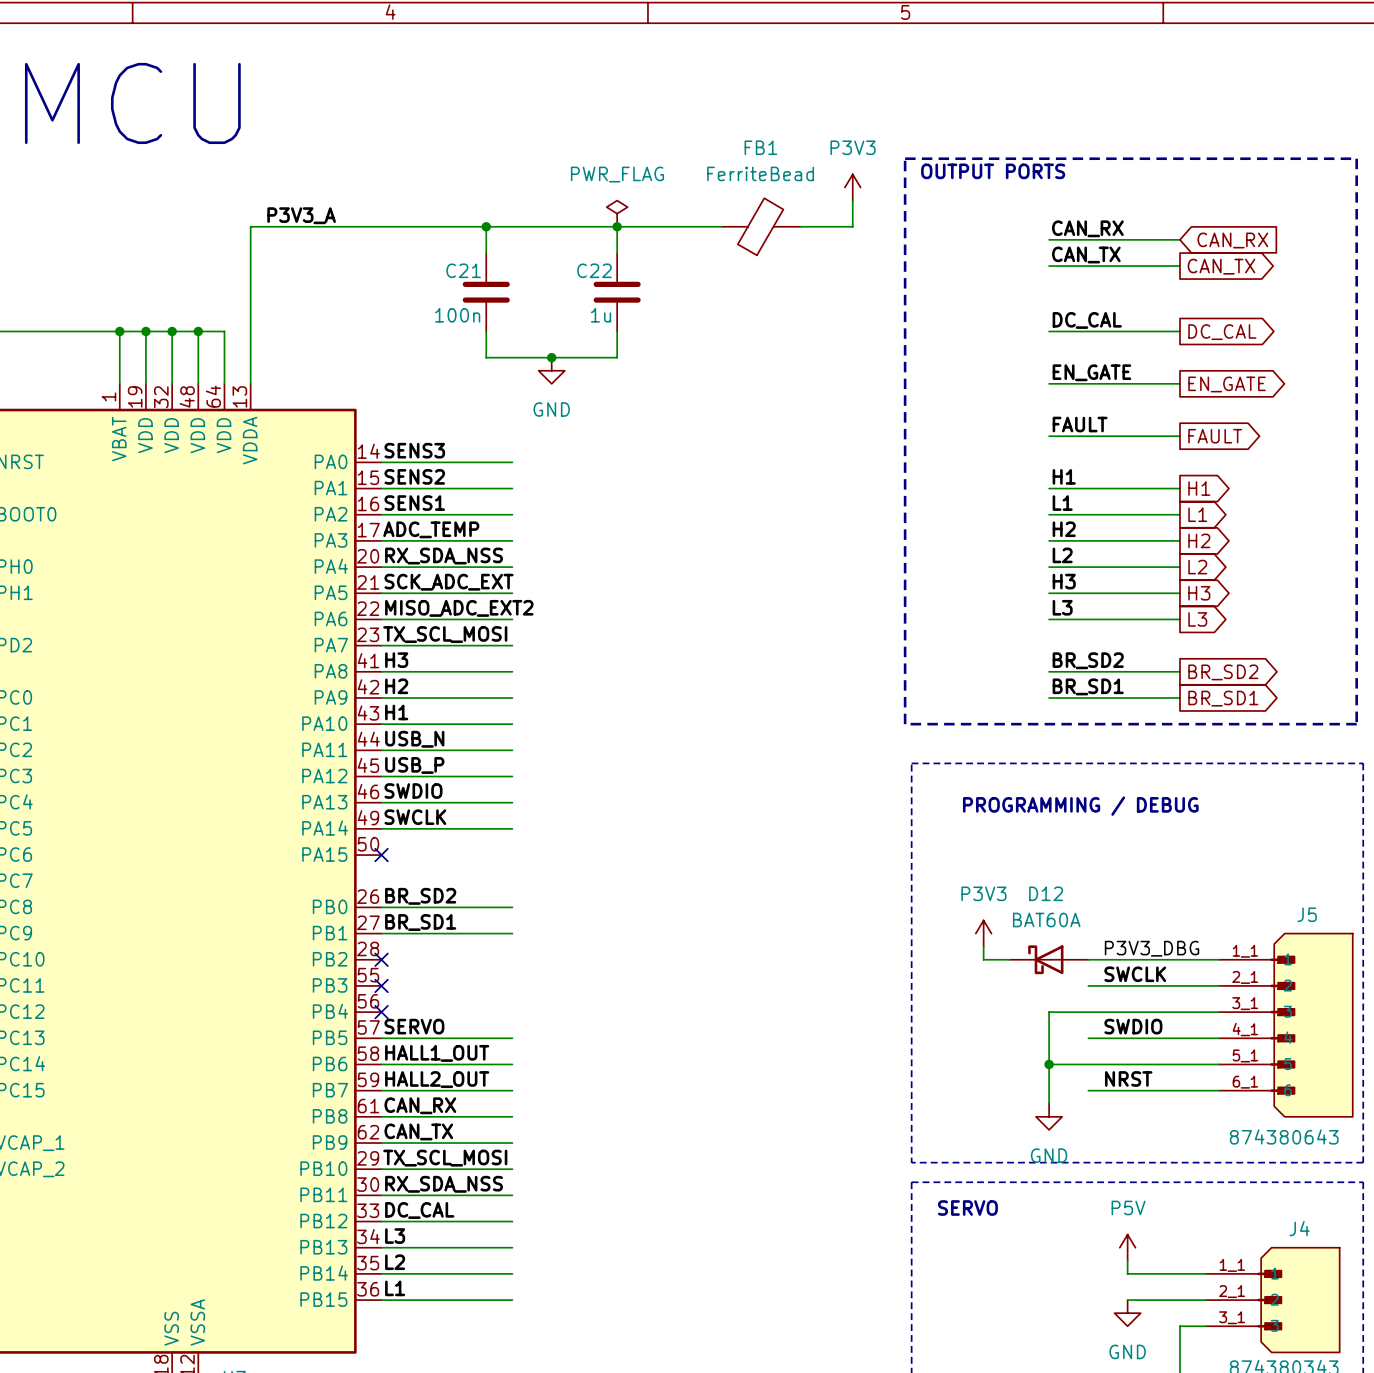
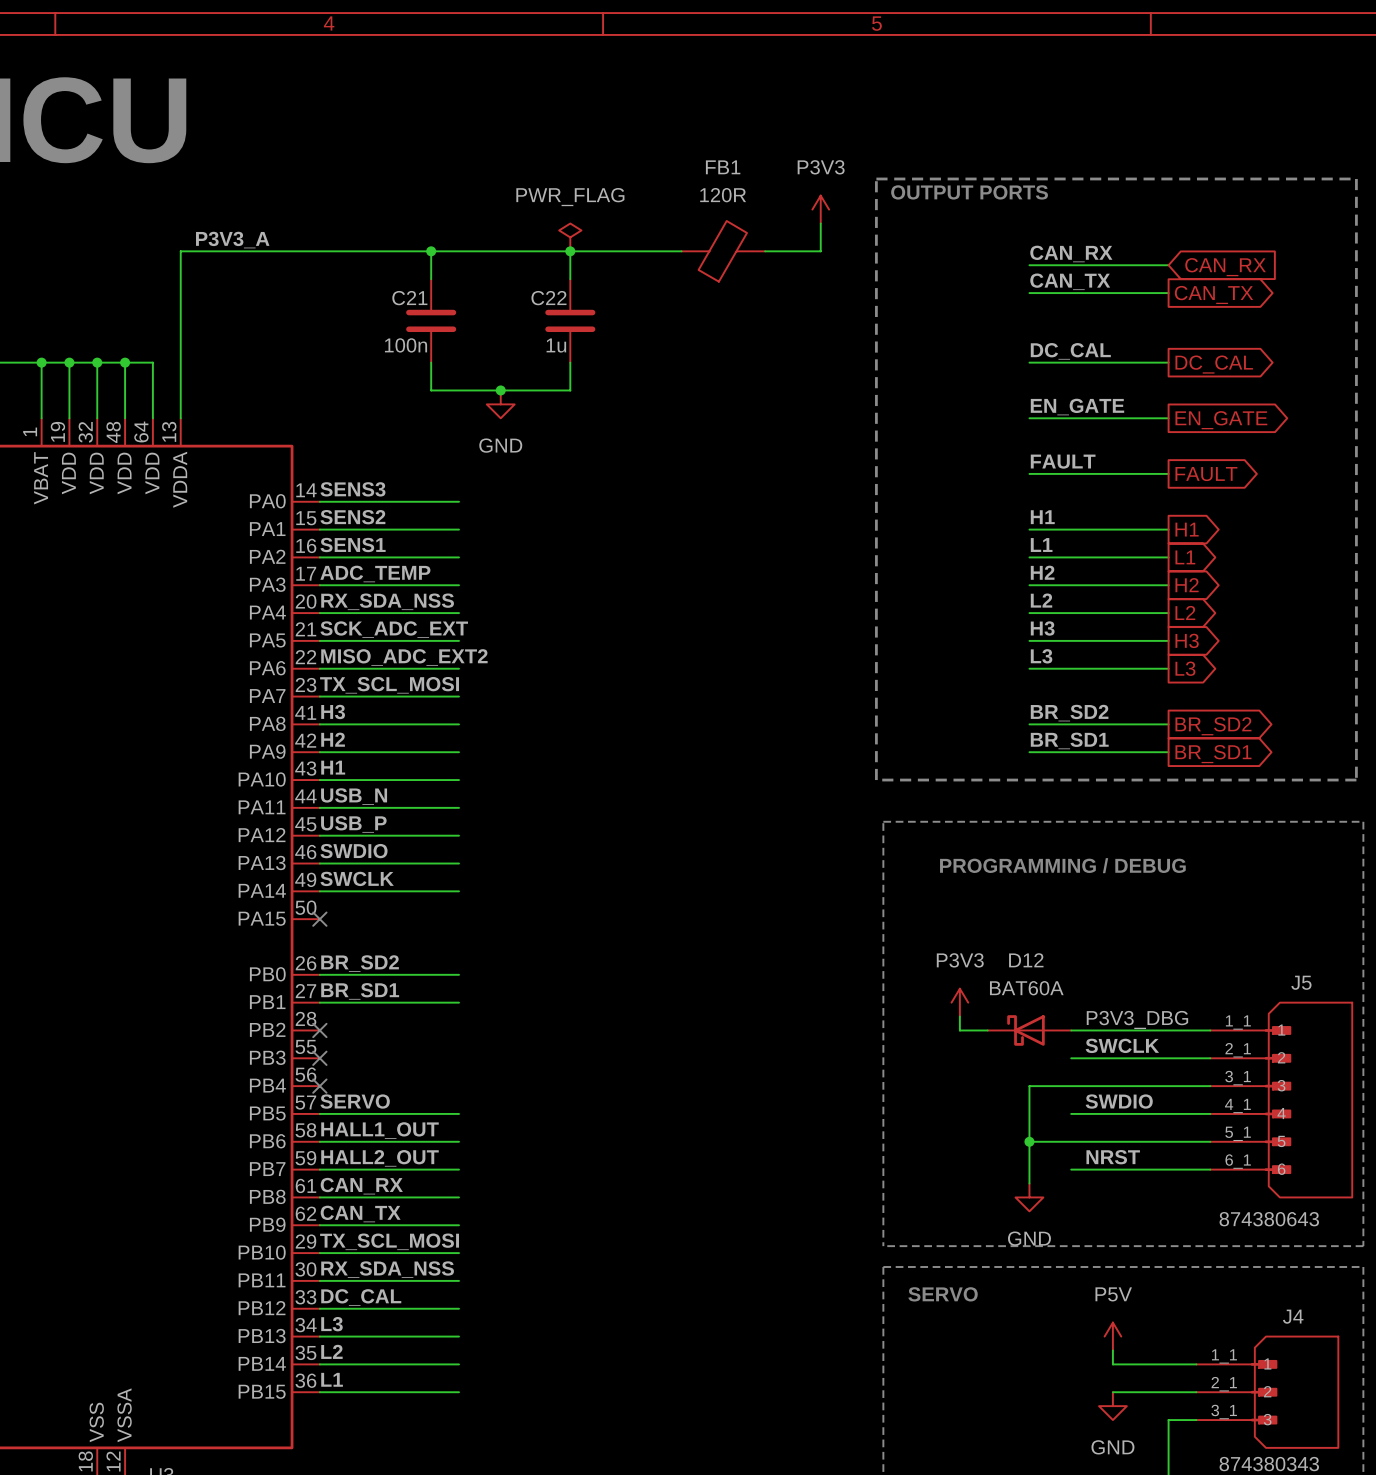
FB1 value: FerriteBead (760, 173) -> 120R (723, 195)

